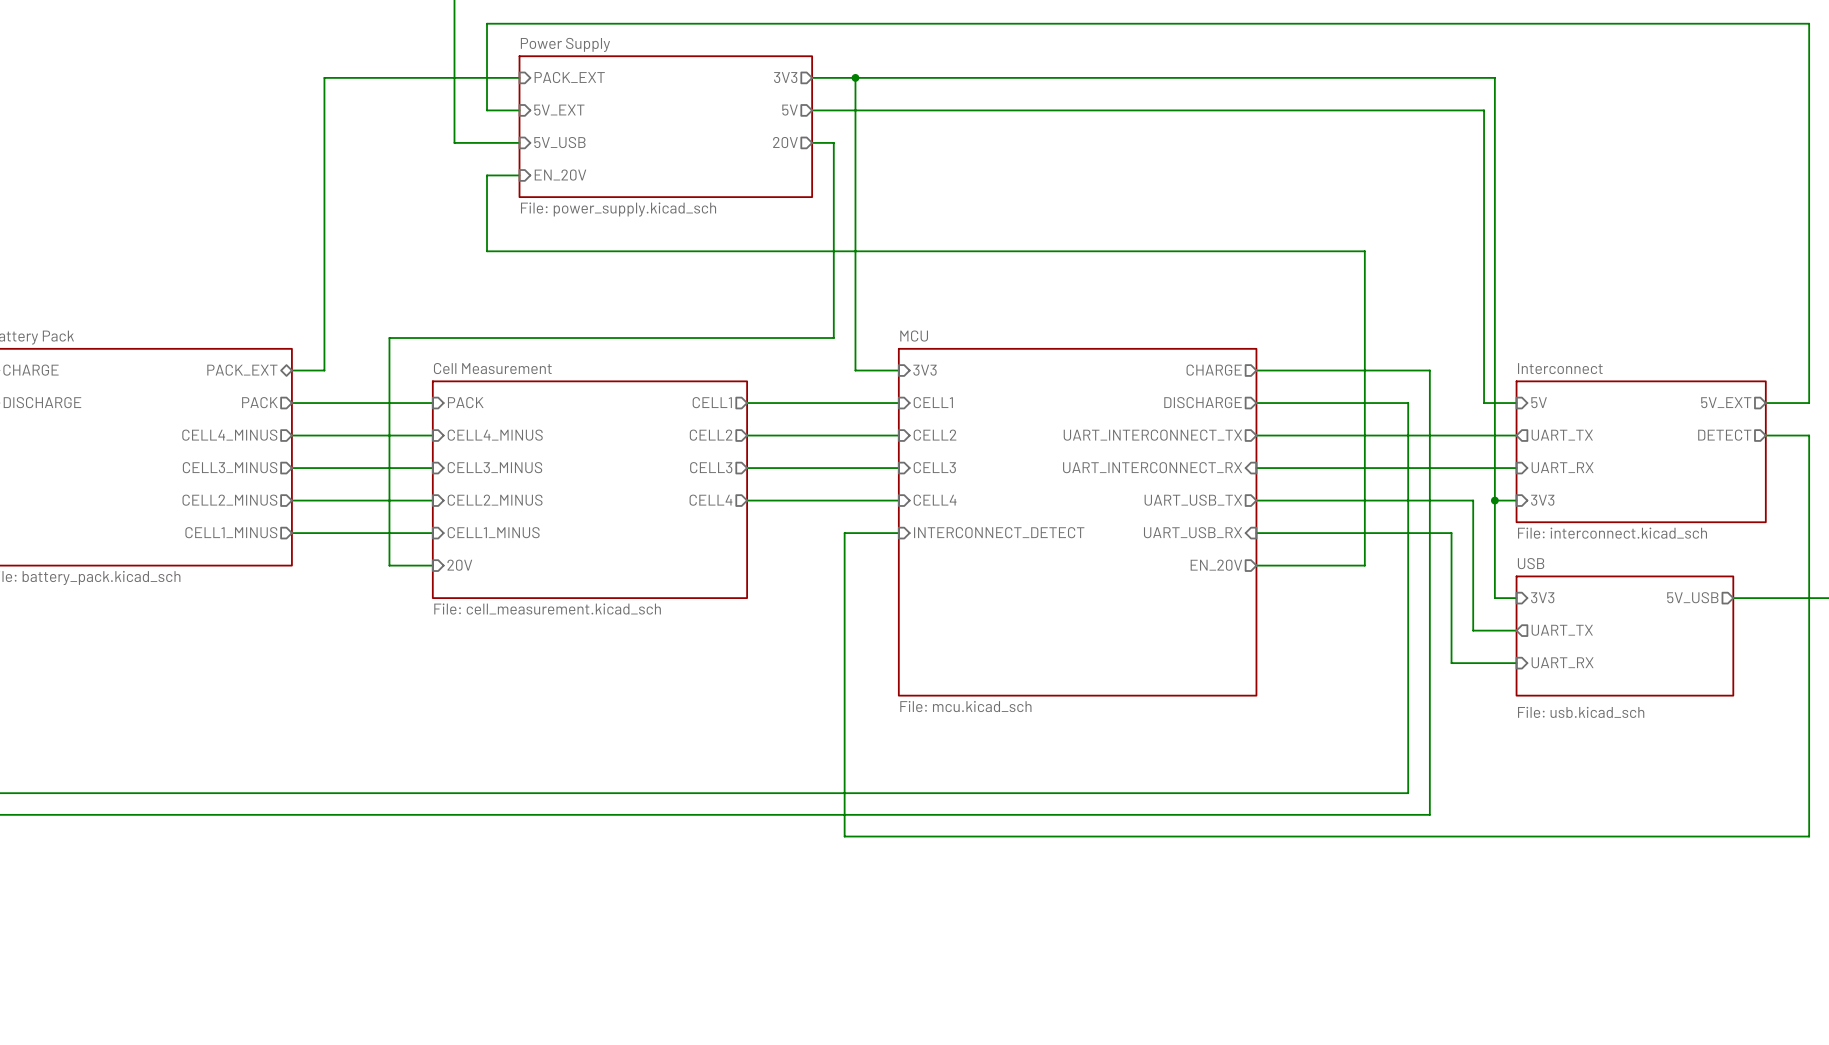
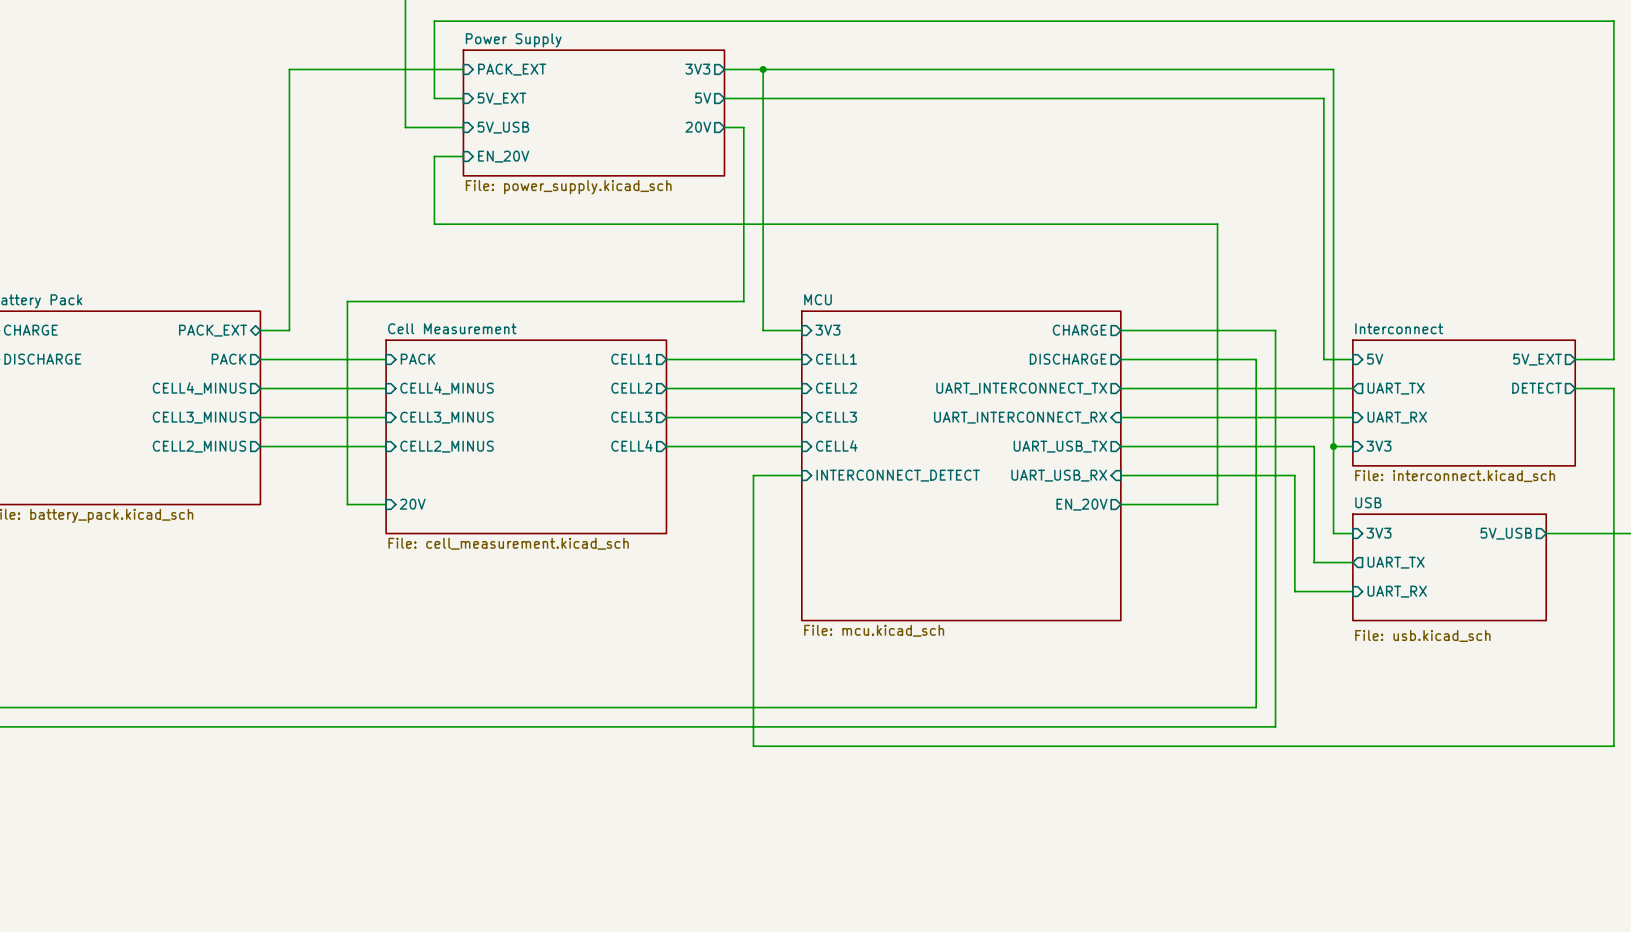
sheet pin: CELL1_MINUS (231, 532) -> none
sheet pin: CELL1_MINUS (493, 532) -> none
wire: (291, 533) (432, 533) -> none

